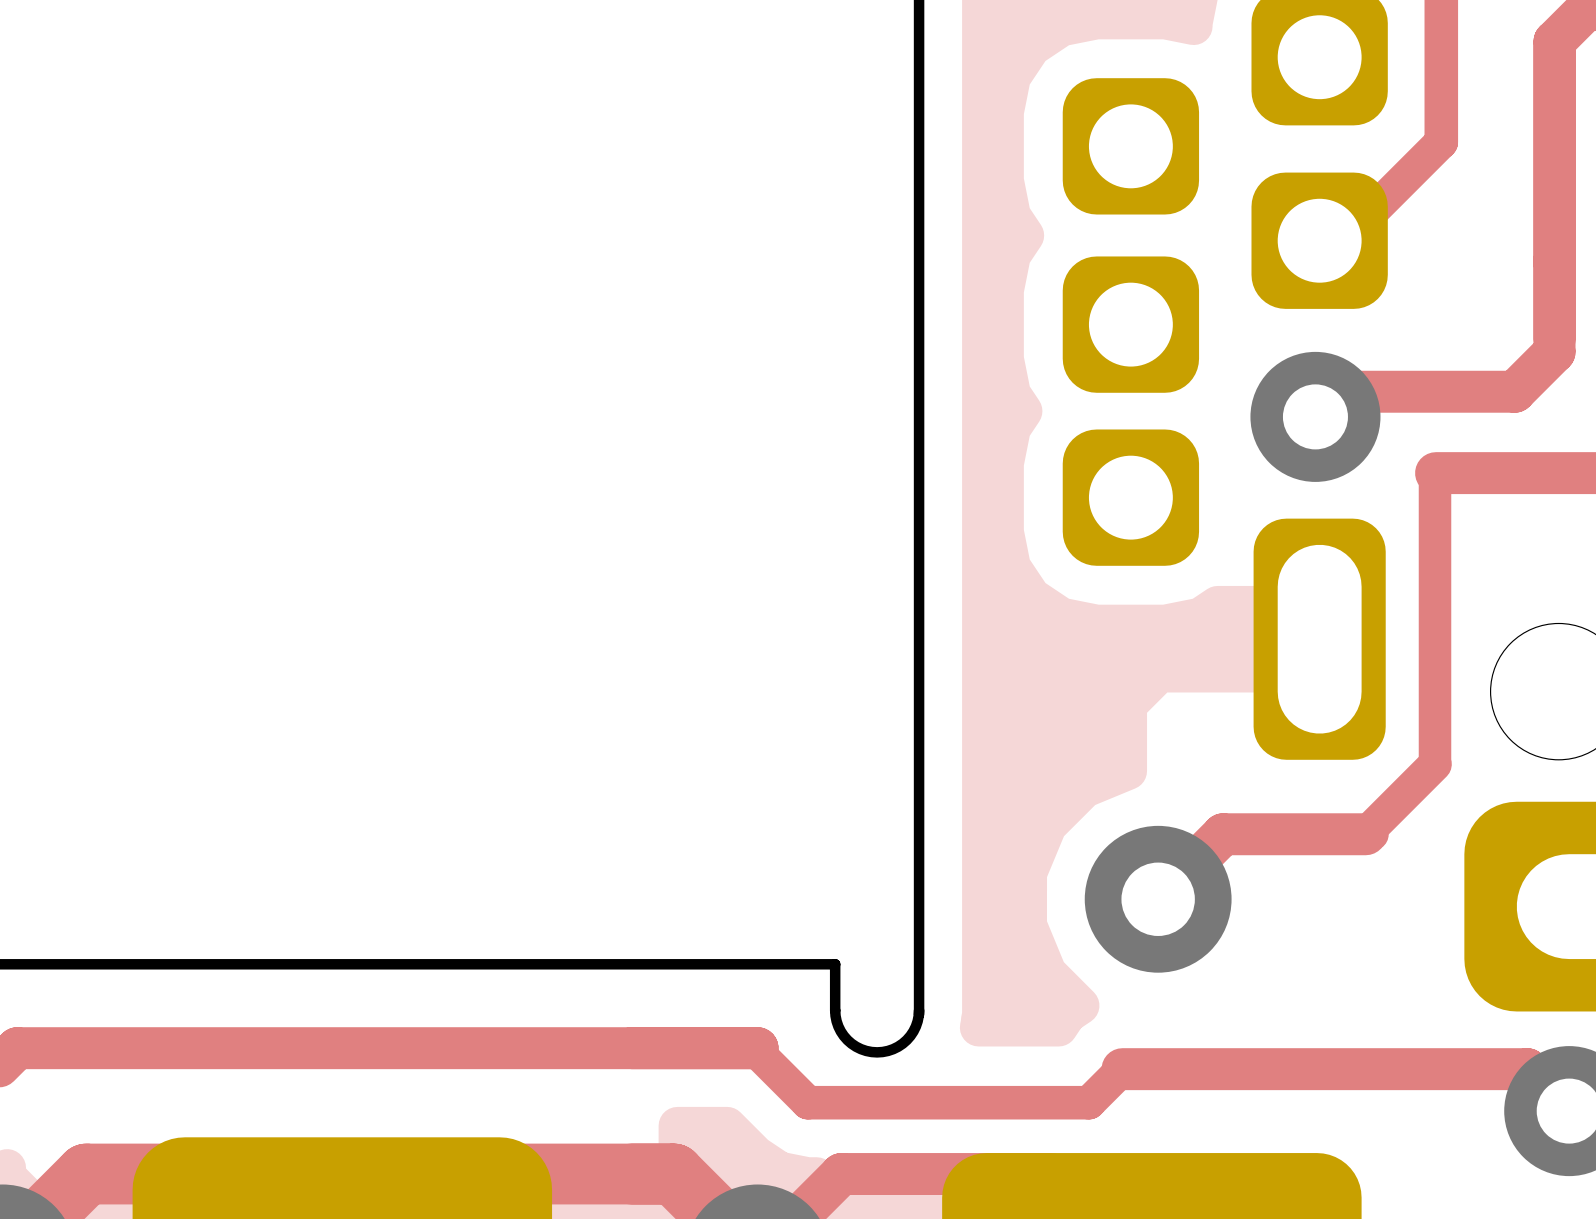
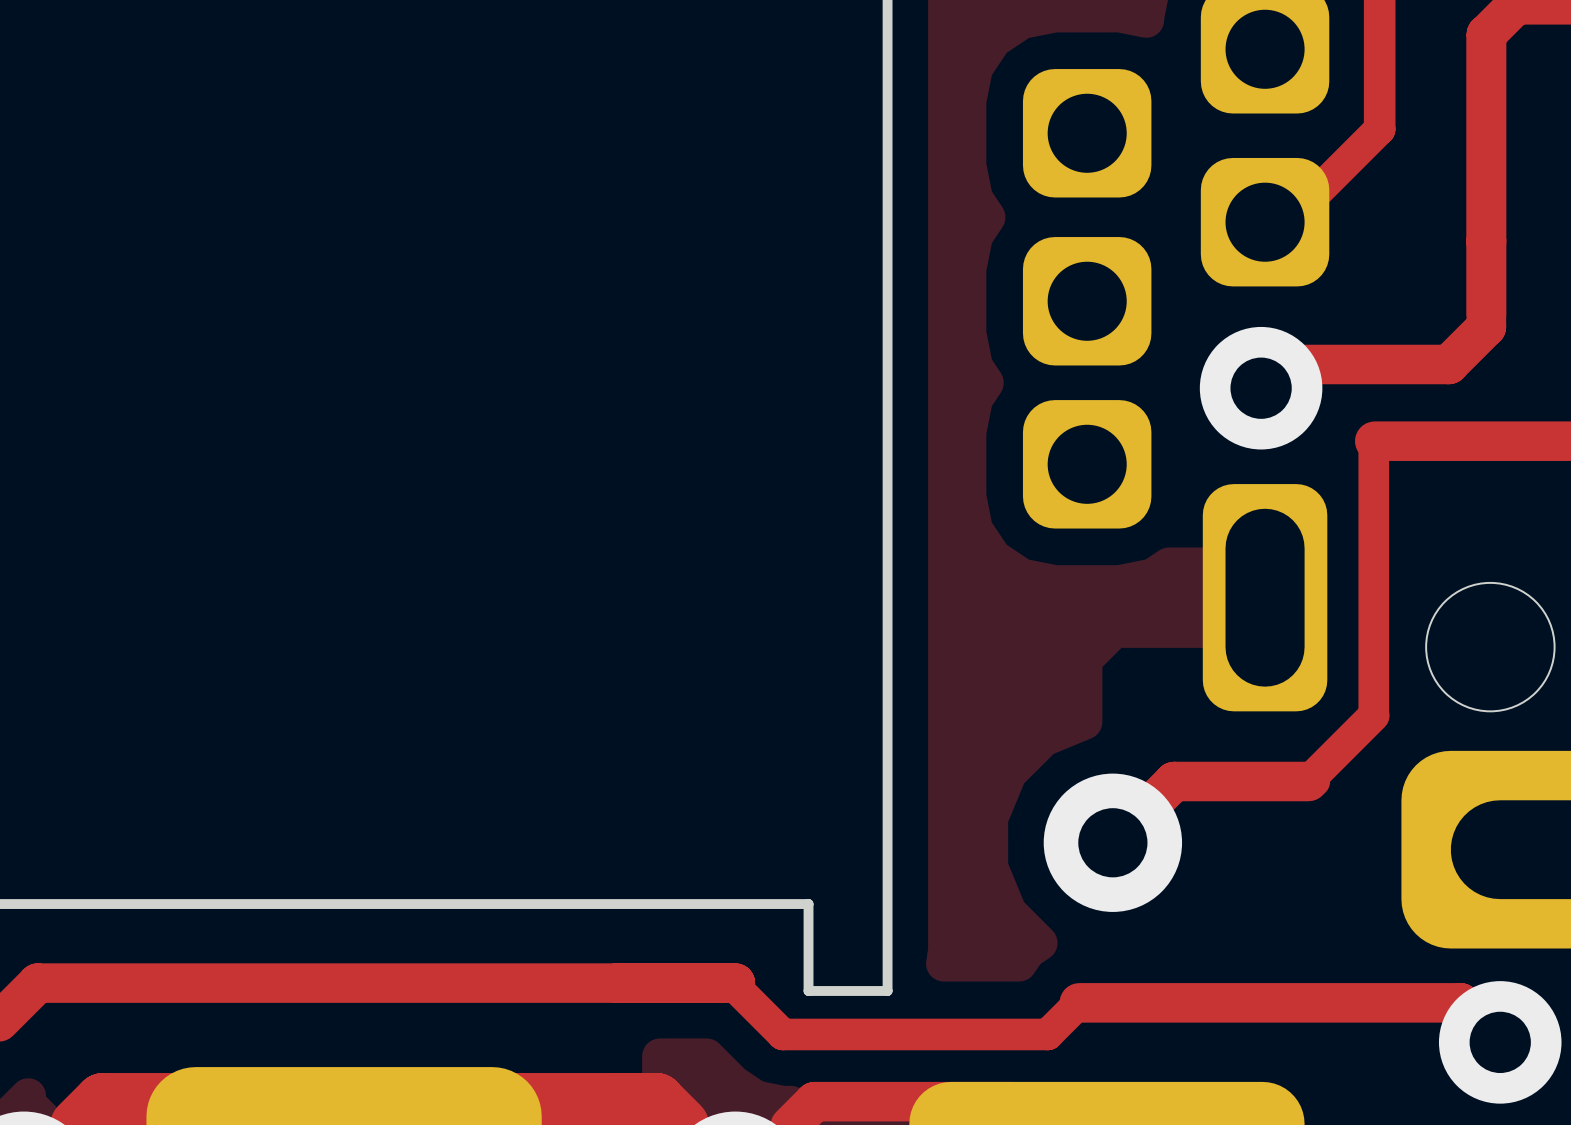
board edge: (835, 1010) (838, 1026) (847, 1040) (861, 1049) (877, 1052) (893, 1049) (906, 1040) (915, 1026) (919, 1010) -> (808, 947) (808, 990) (887, 990) (887, 951)

